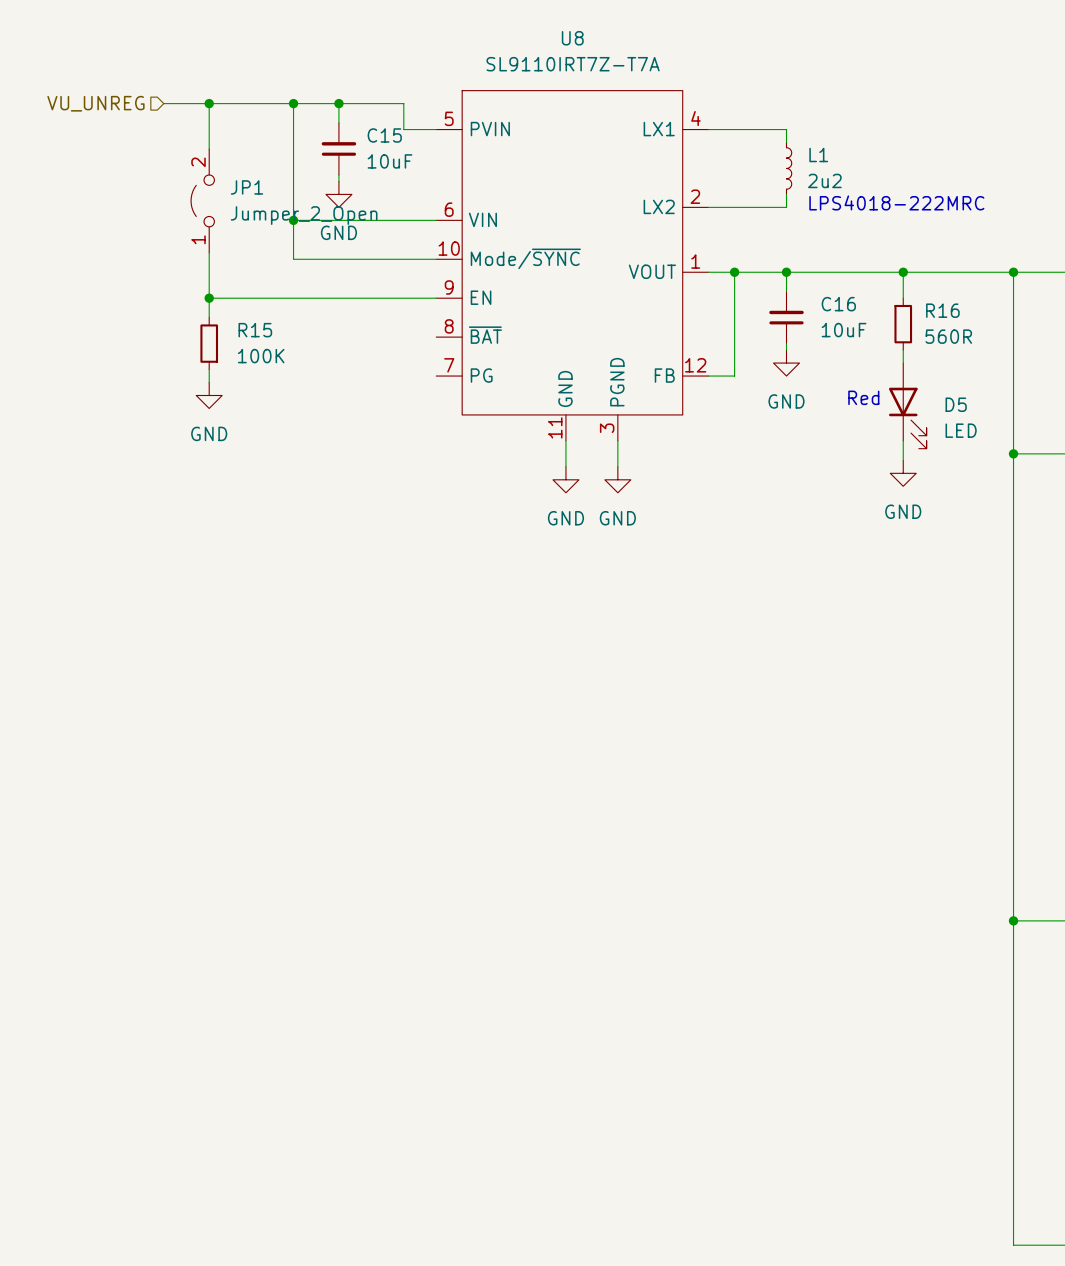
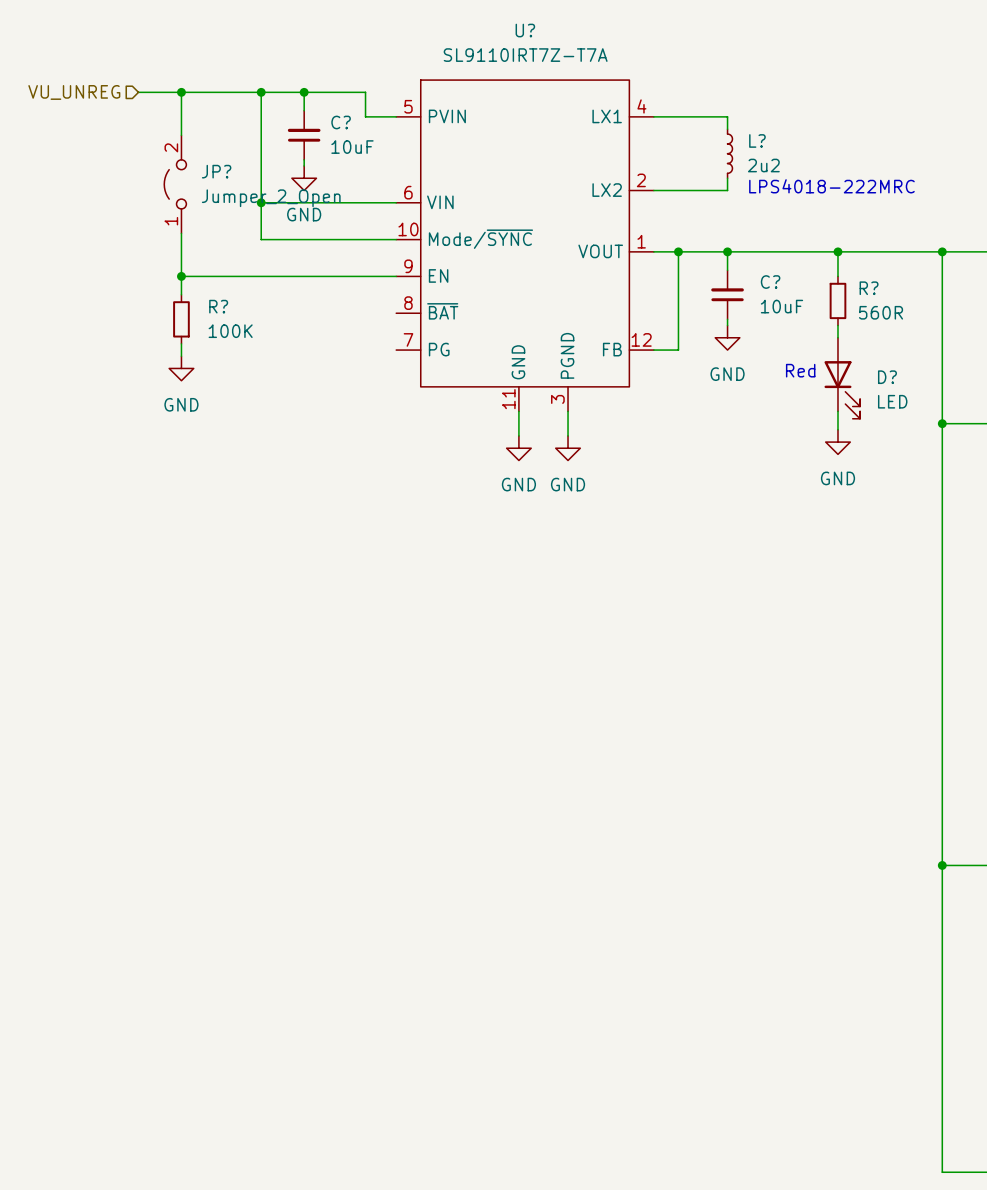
U8 name: U8 (572, 38) -> U? (525, 30)
C15 name: C15 (384, 135) -> C? (341, 122)
L1 name: L1 (818, 155) -> L? (757, 140)
JP1 name: JP1 (246, 187) -> JP? (216, 171)
C16 name: C16 (838, 304) -> C? (770, 282)
R16 name: R16 (942, 310) -> R? (869, 288)
R15 name: R15 (255, 330) -> R? (218, 306)
D5 name: D5 (956, 404) -> D? (887, 377)

